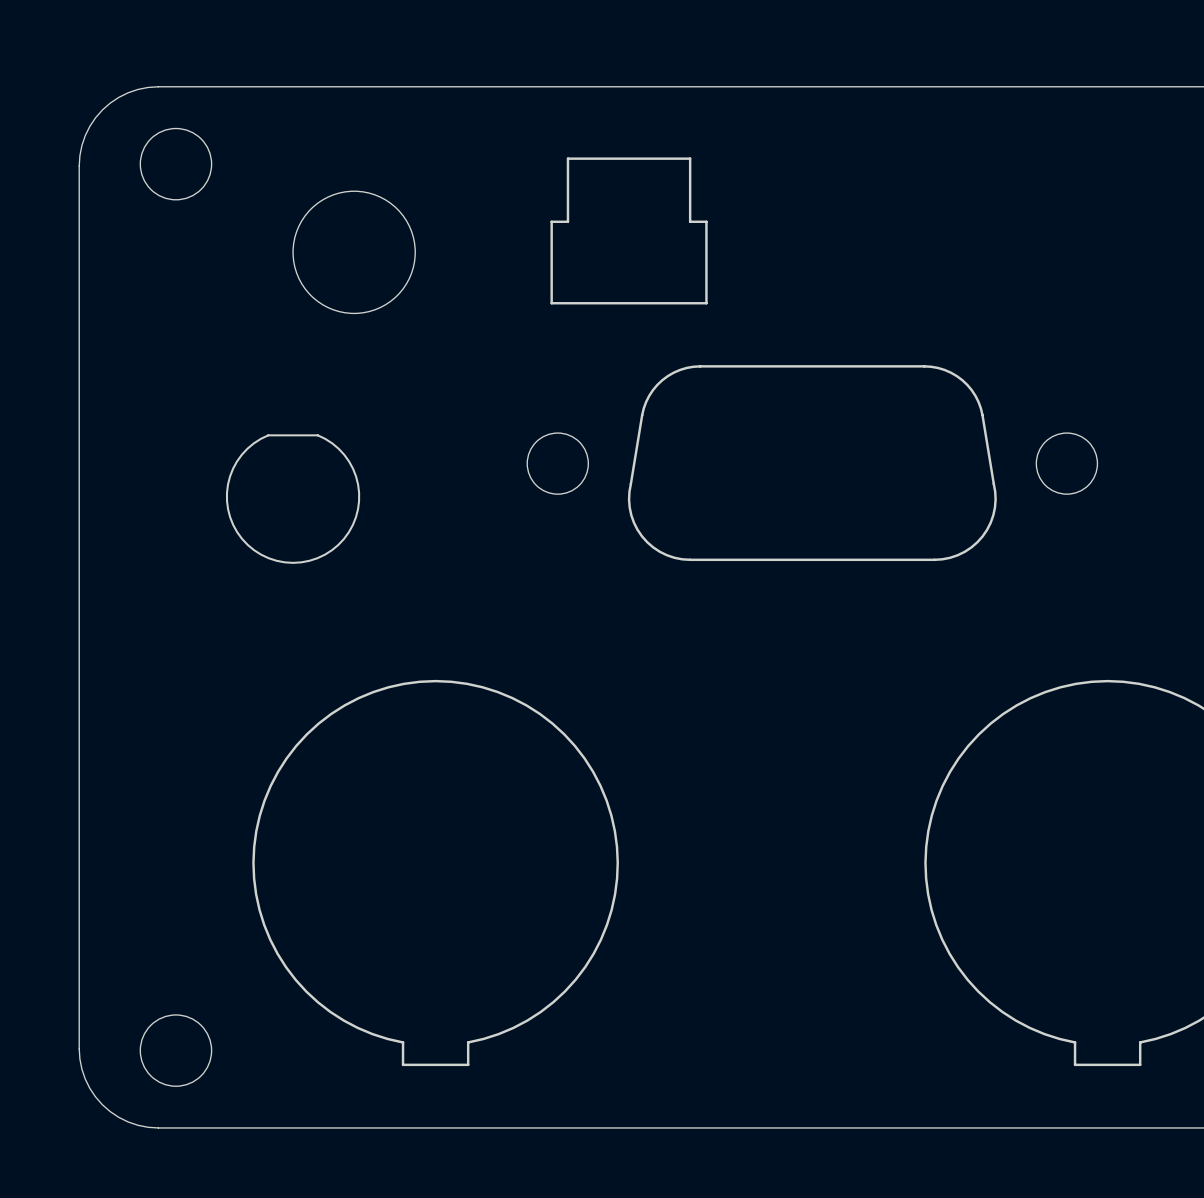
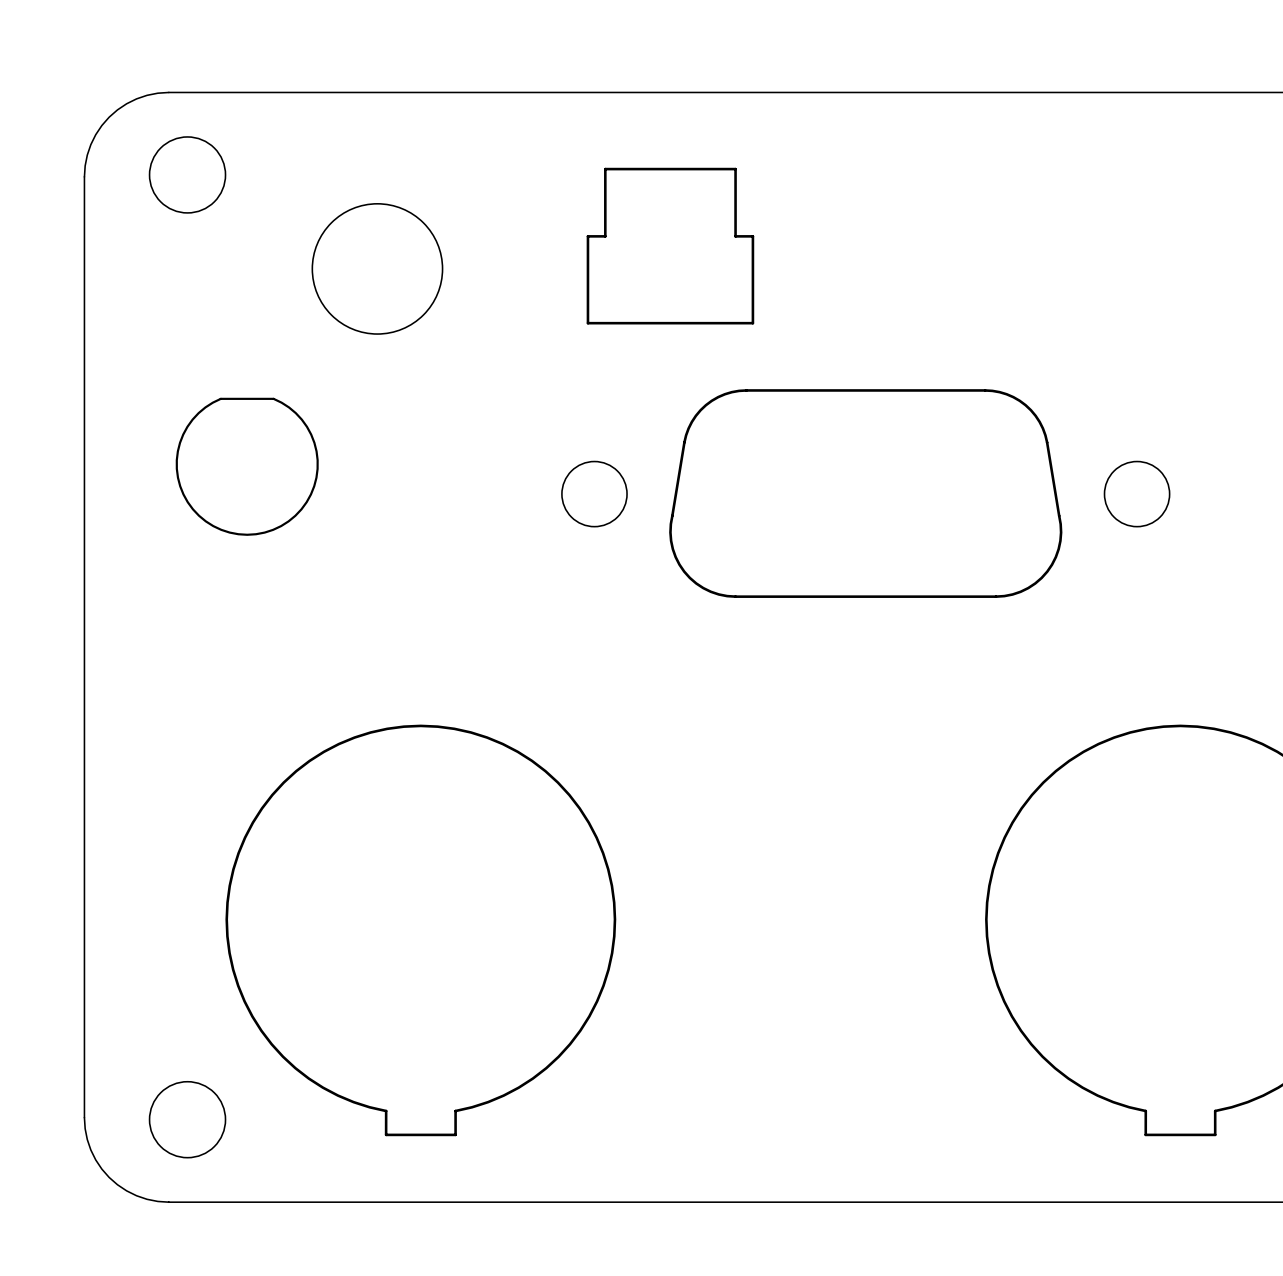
drawing position: (293, 499) -> (247, 466)
drawing position: (435, 872) -> (420, 930)

